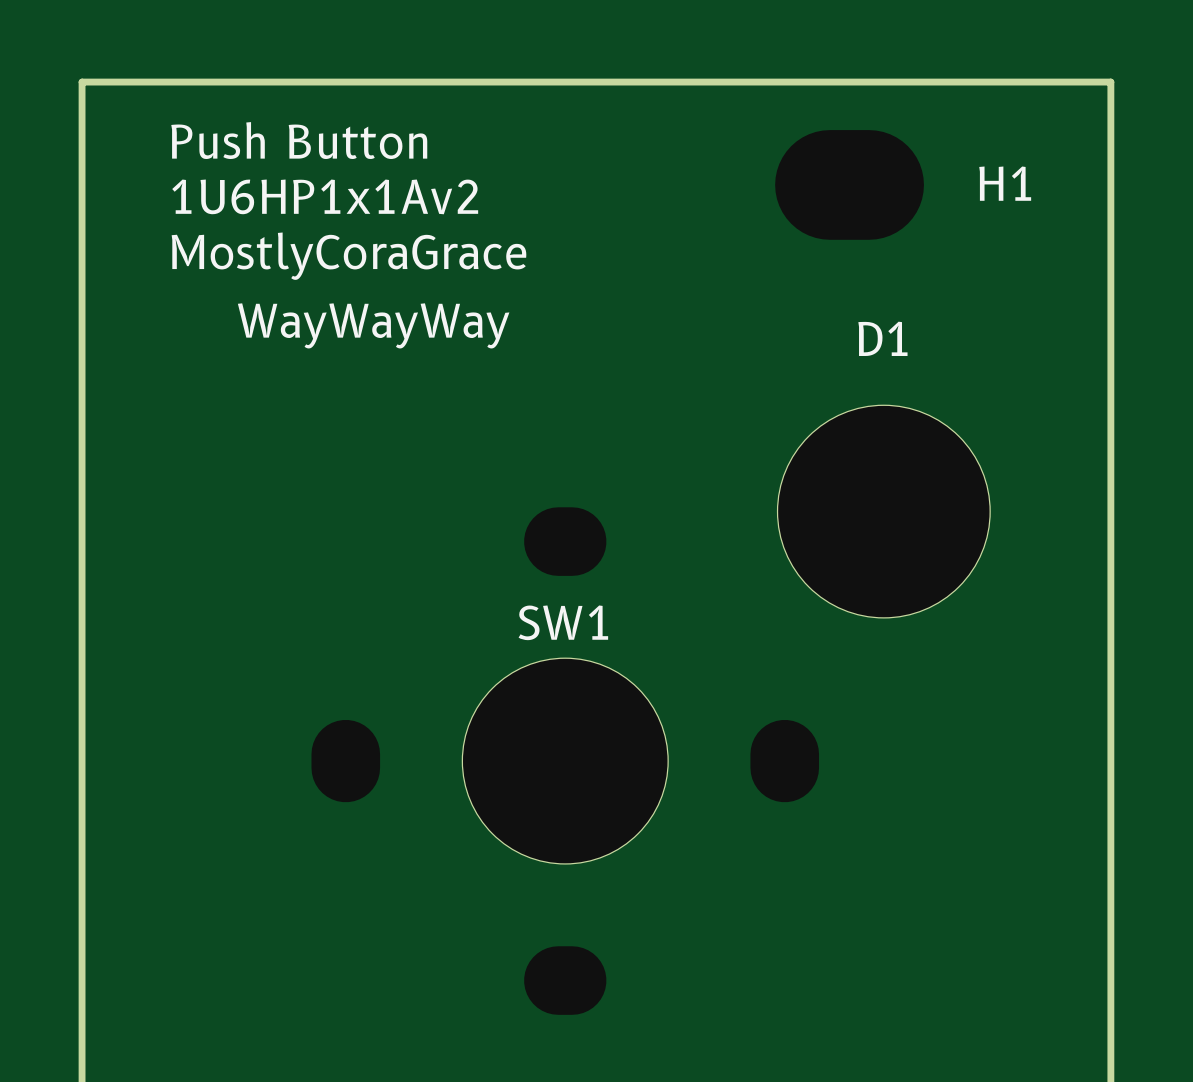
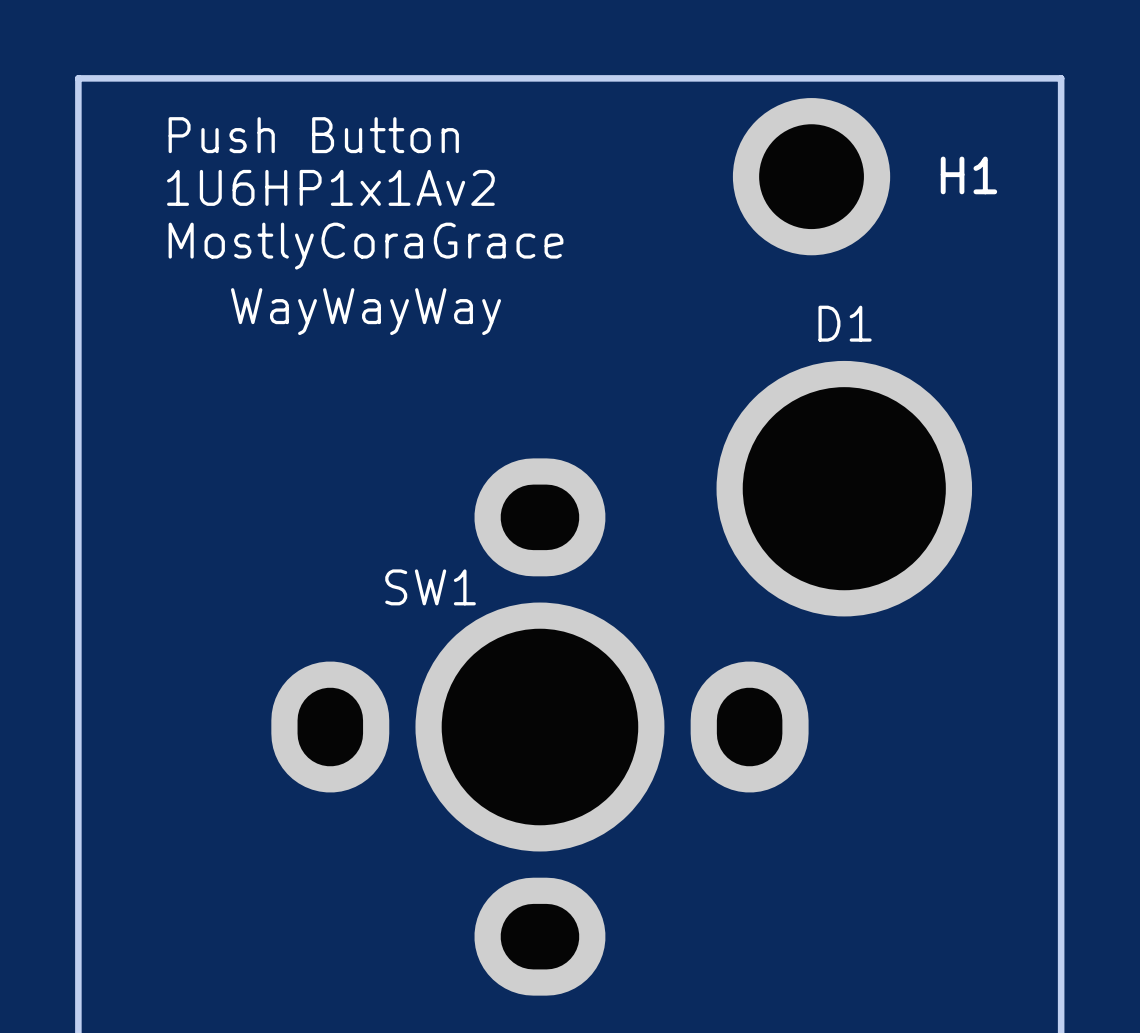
H1 footprint: [775, 130, 924, 240] -> [732, 98, 891, 256]
D1 footprint: [777, 405, 991, 618] -> [716, 360, 973, 617]
SW1 footprint: [311, 507, 820, 1015] -> [271, 458, 809, 996]
SW1 name position: SW1 (563, 622) -> SW1 (430, 587)

